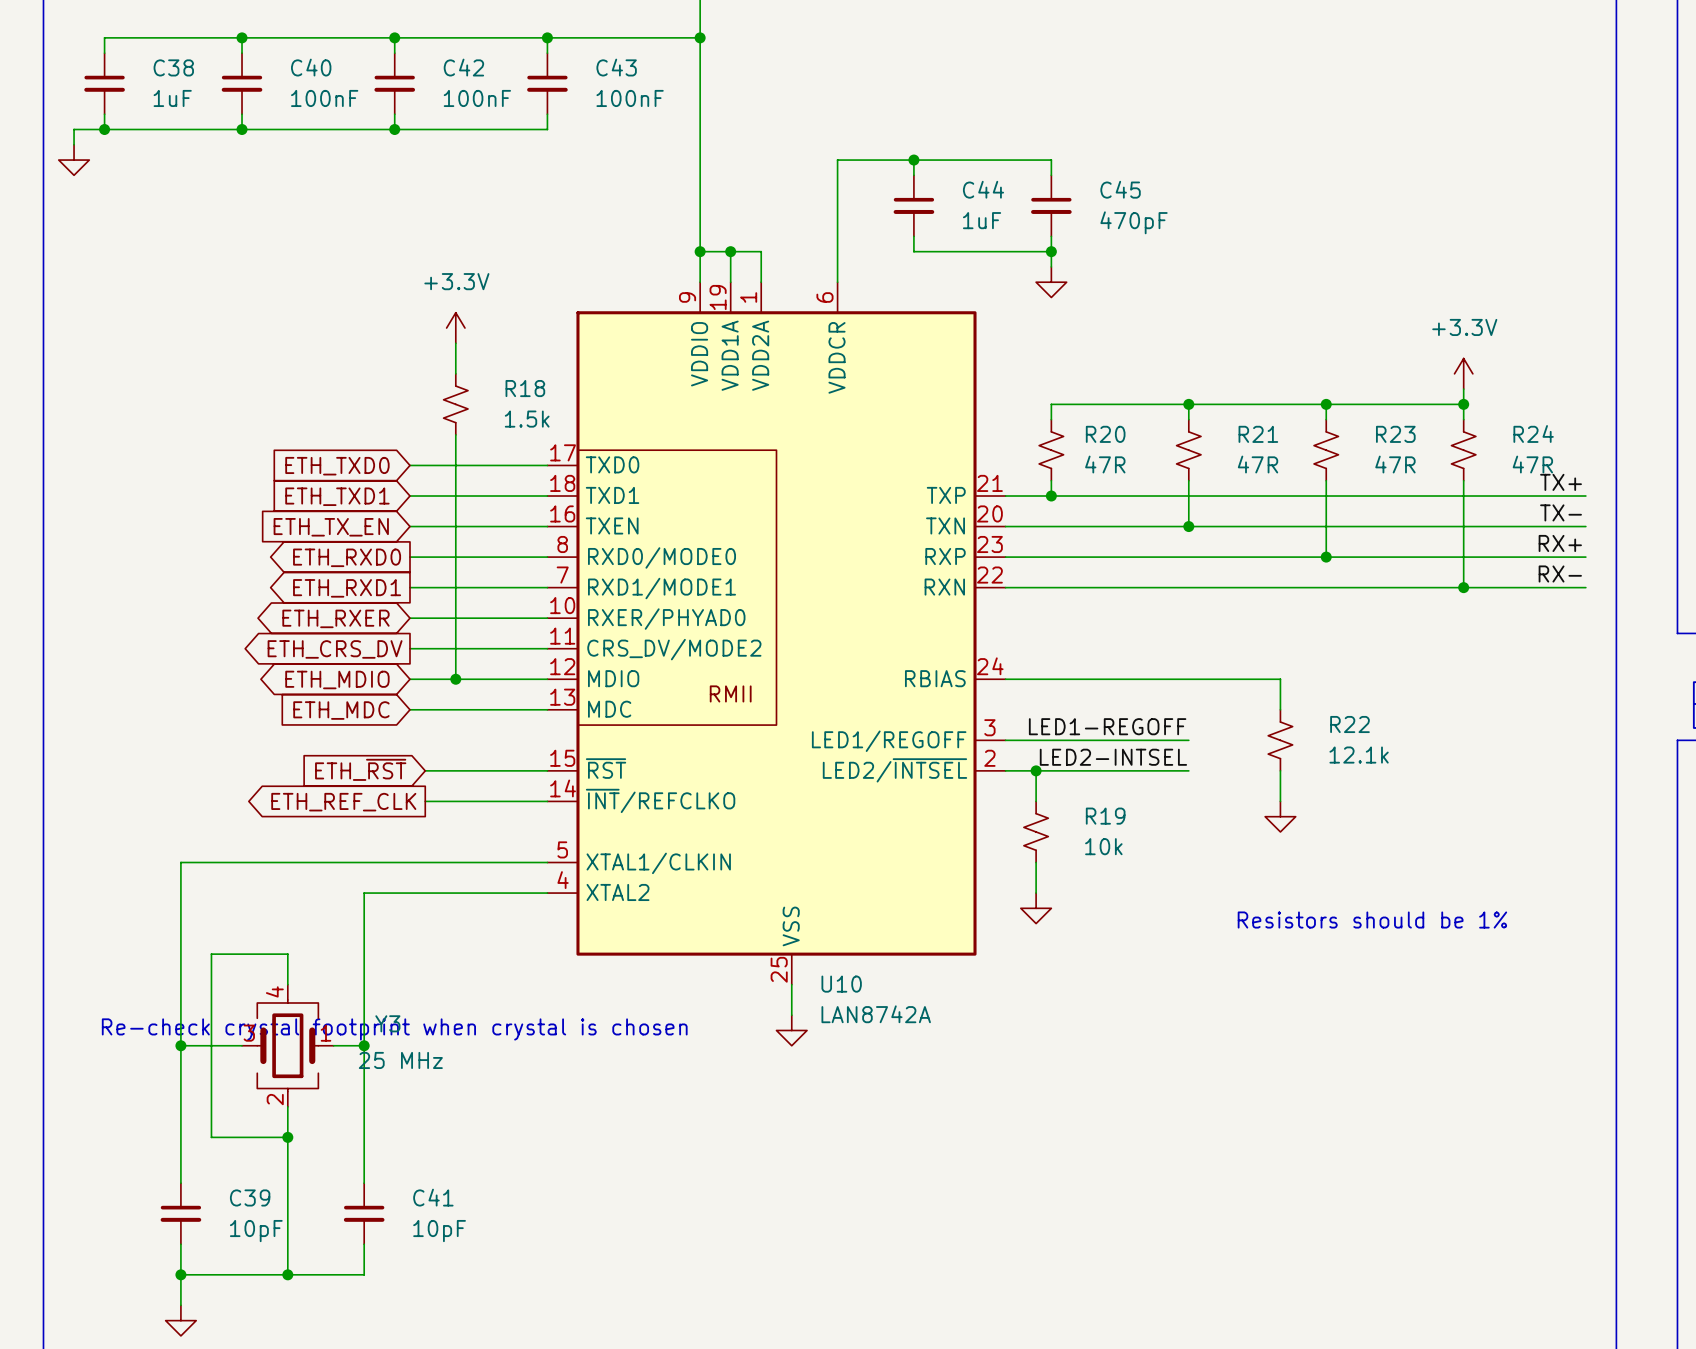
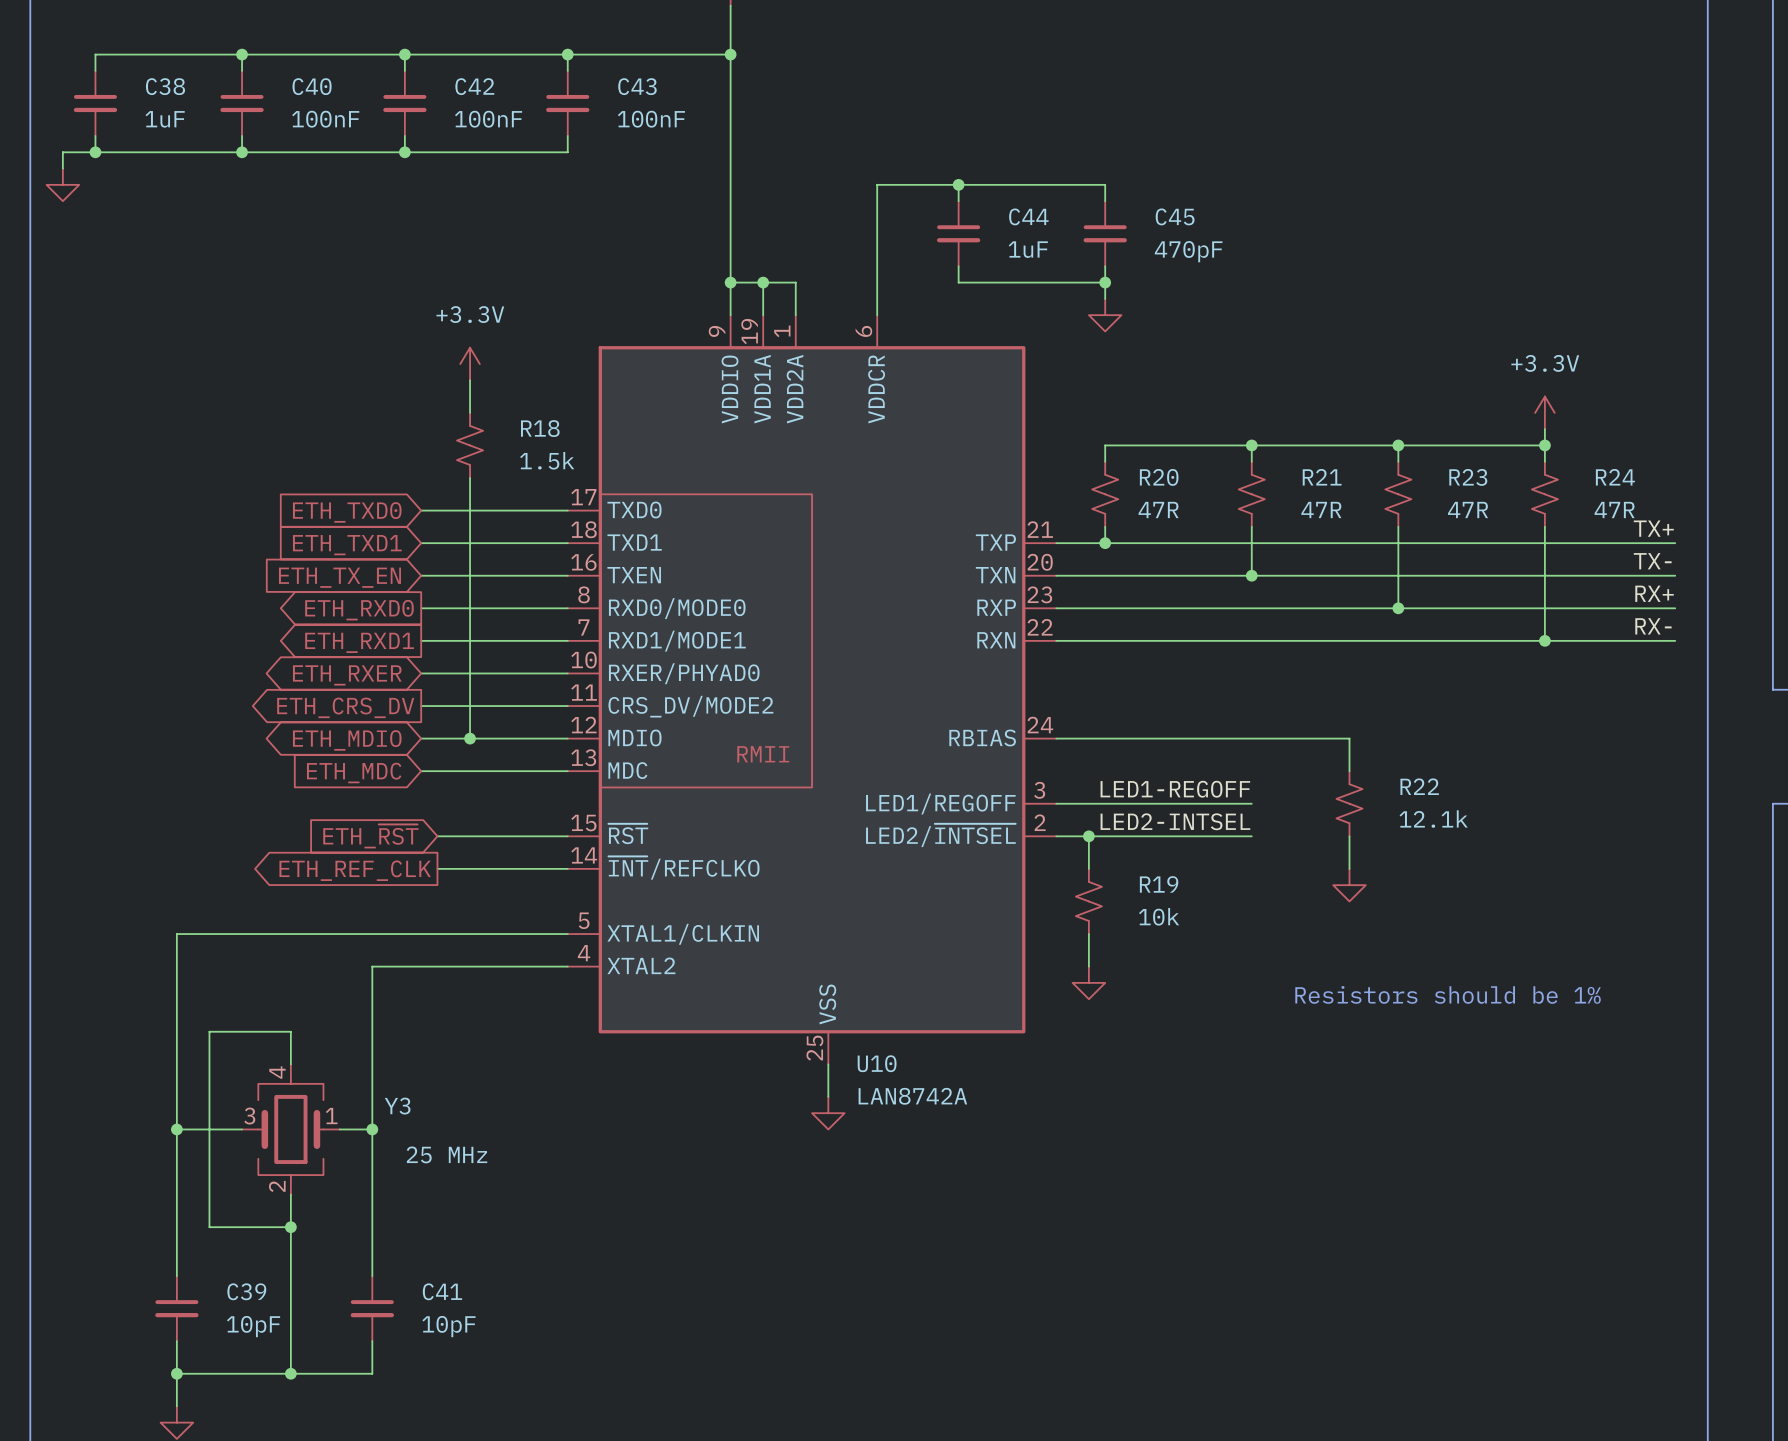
text: Re-check crystal footprint when crystal is chosen (394, 1029) -> none
Y3 value position: 25 MHz (400, 1060) -> 25 MHz (447, 1154)

